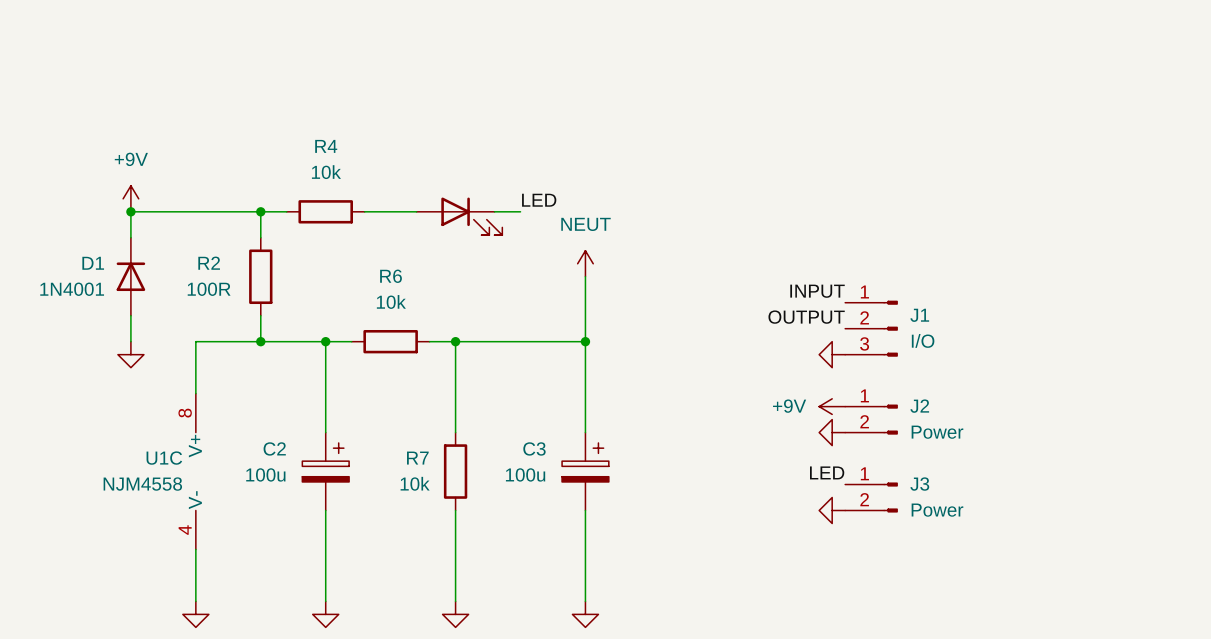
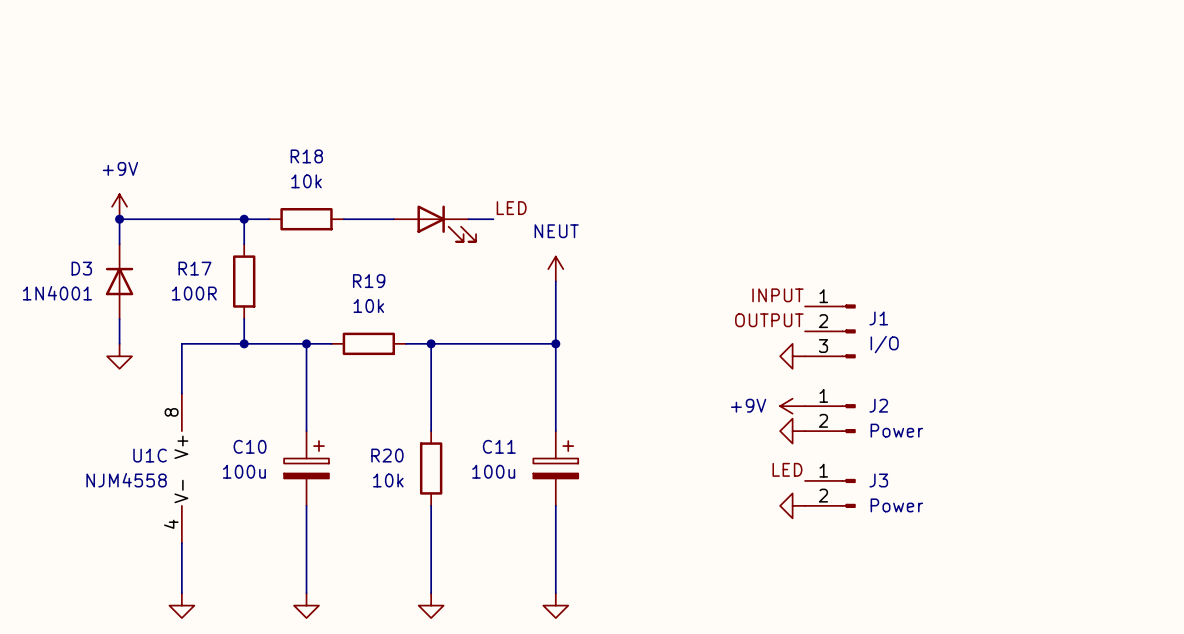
R4 name: R4 (326, 146) -> R18 (306, 156)
D1 name: D1 (93, 263) -> D3 (81, 268)
R2 name: R2 (209, 263) -> R17 (194, 268)
R6 name: R6 (391, 276) -> R19 (369, 281)
C2 name: C2 (274, 448) -> C10 (250, 446)
C3 name: C3 (534, 448) -> C11 (499, 446)
R7 name: R7 (417, 458) -> R20 (387, 455)

